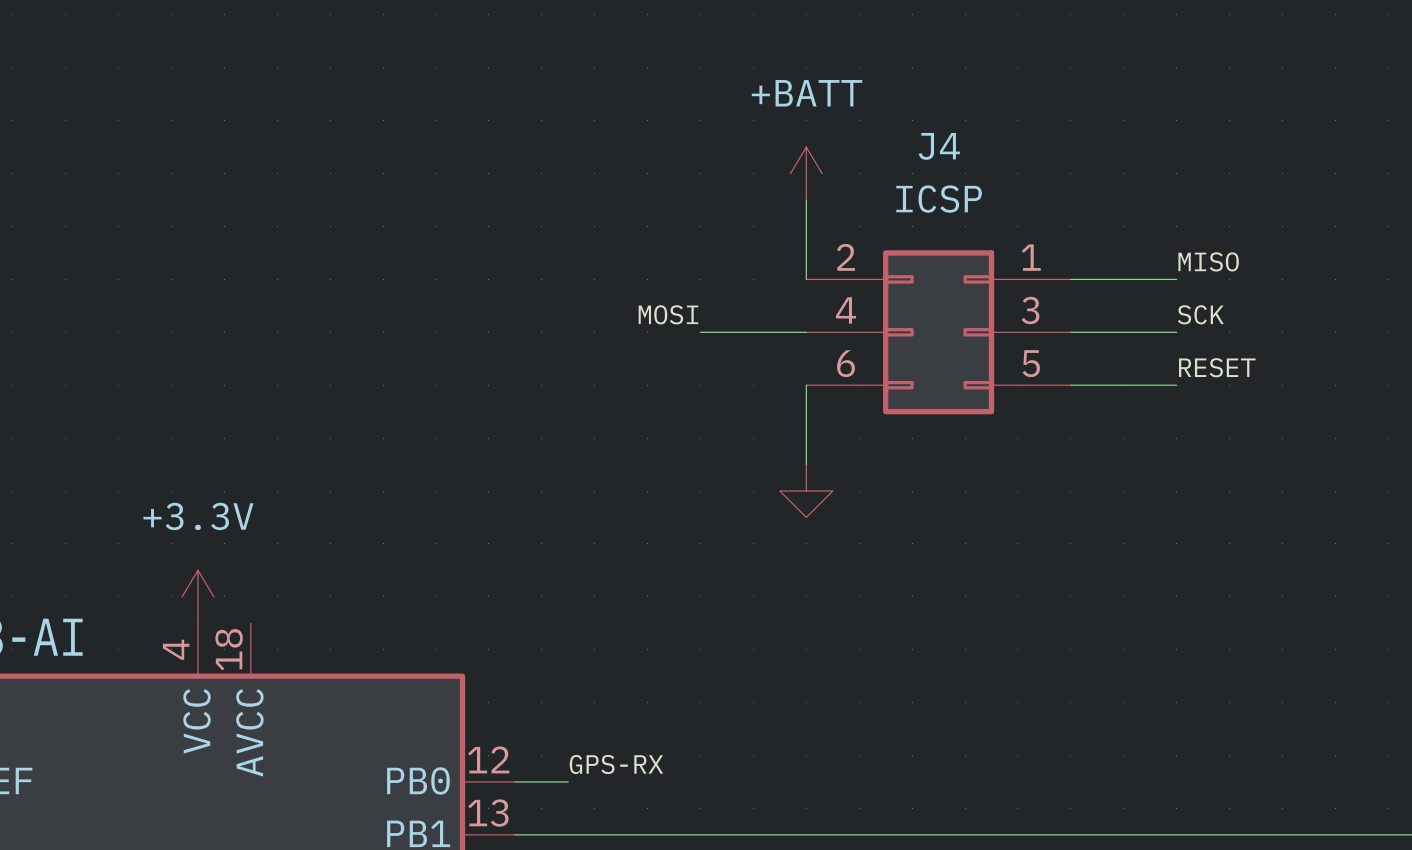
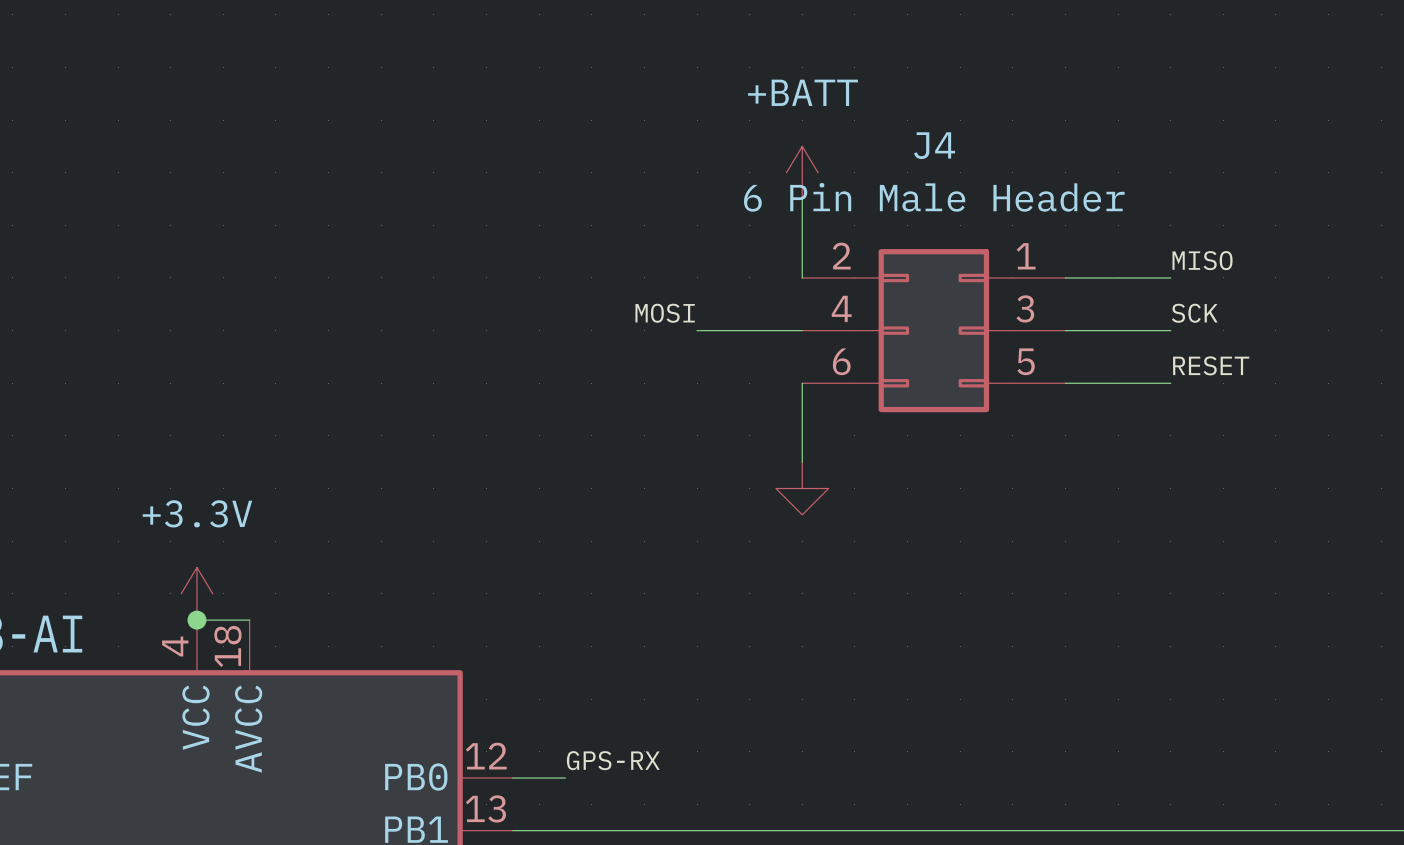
J4 value: ICSP (939, 199) -> 6 Pin Male Header (934, 197)
wire: none -> (196, 620) (249, 620)
junction: none -> (196, 620)

